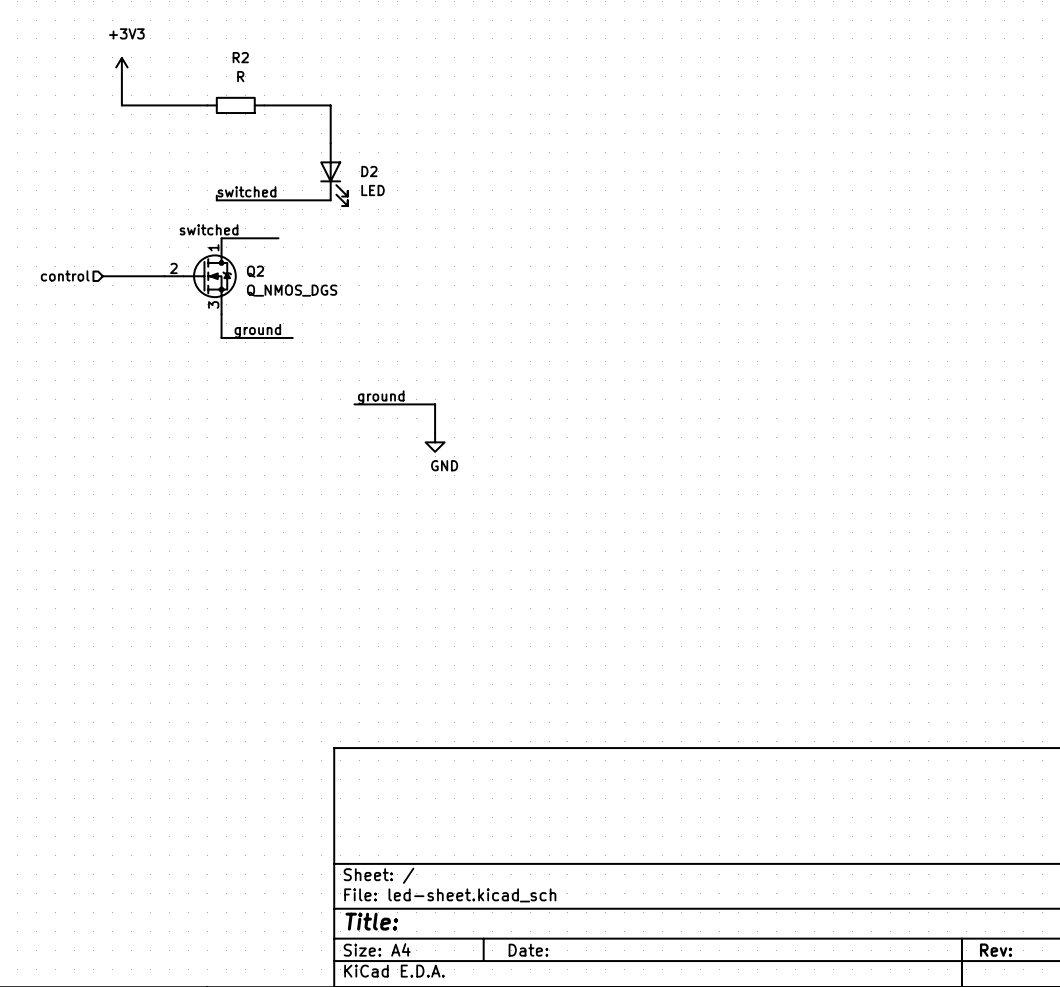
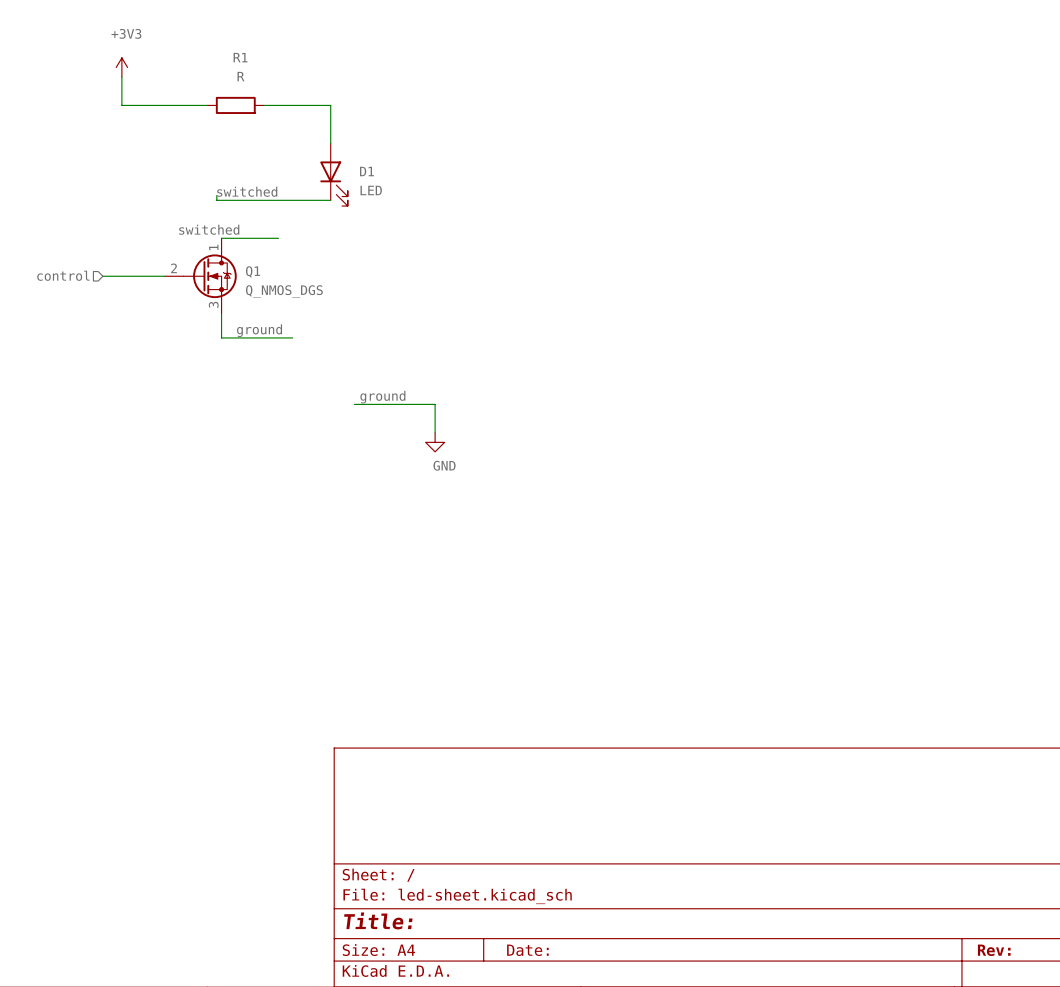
R2 name: R2 (240, 57) -> R1 (240, 57)
D2 name: D2 (369, 171) -> D1 (367, 171)
Q2 name: Q2 (255, 271) -> Q1 (253, 271)

